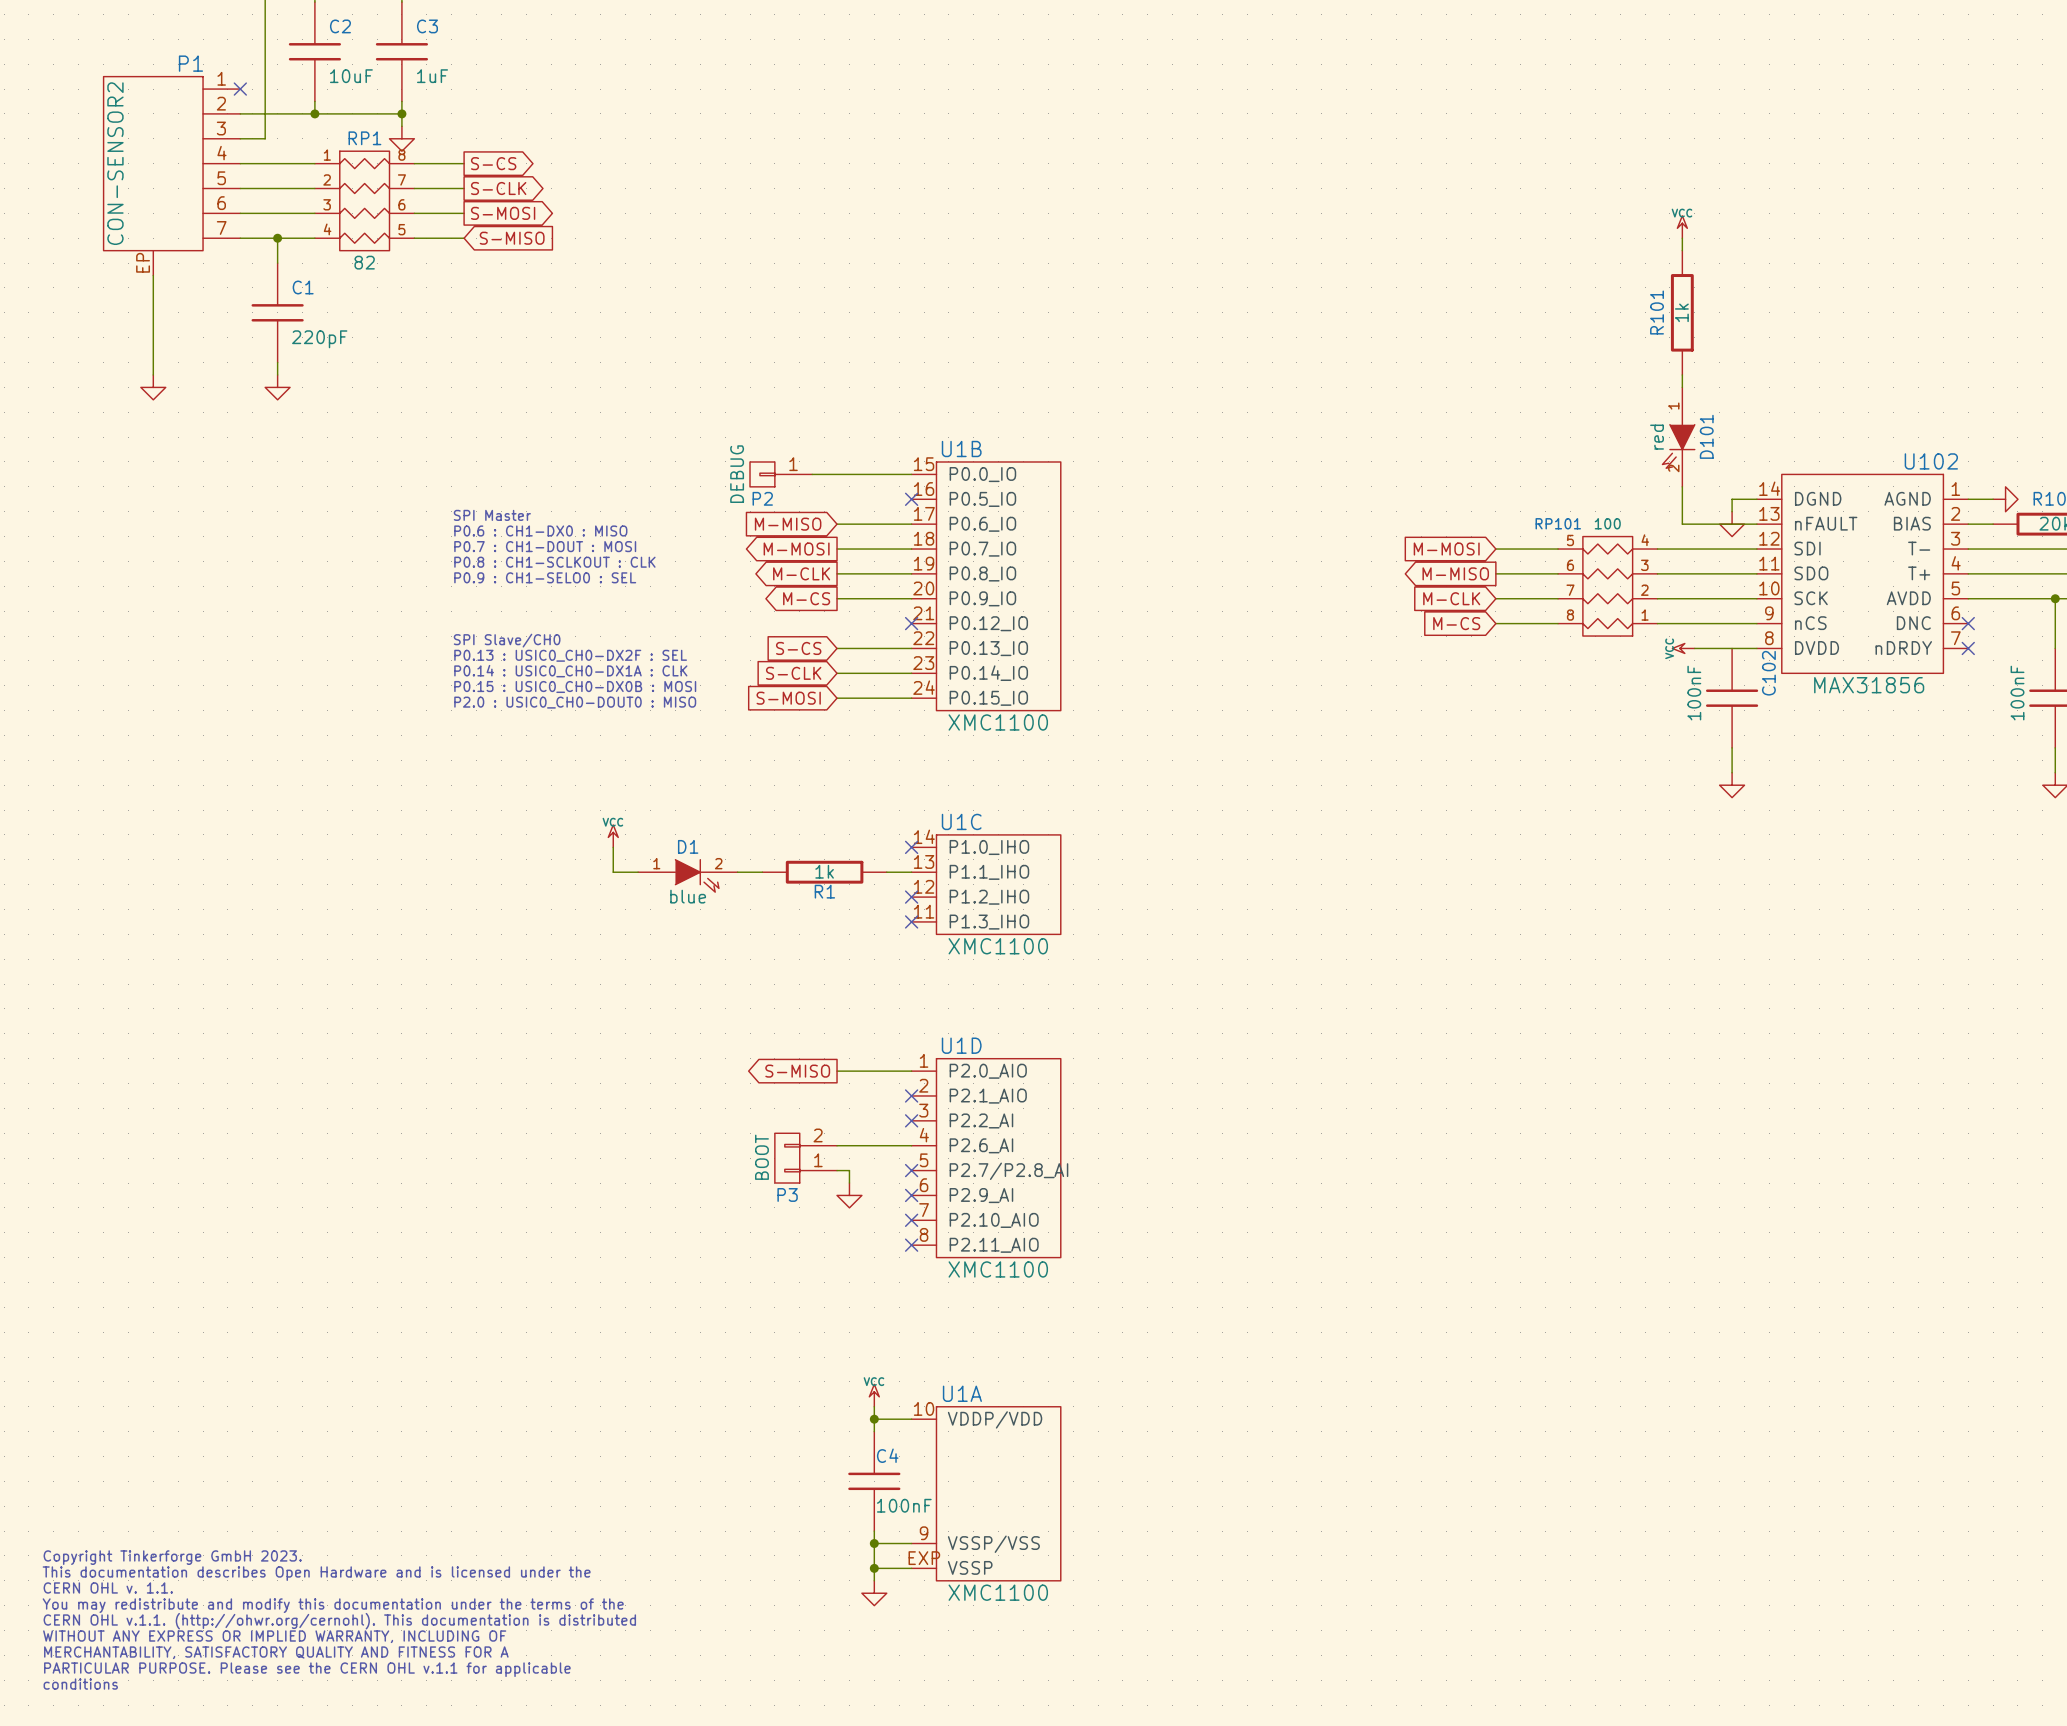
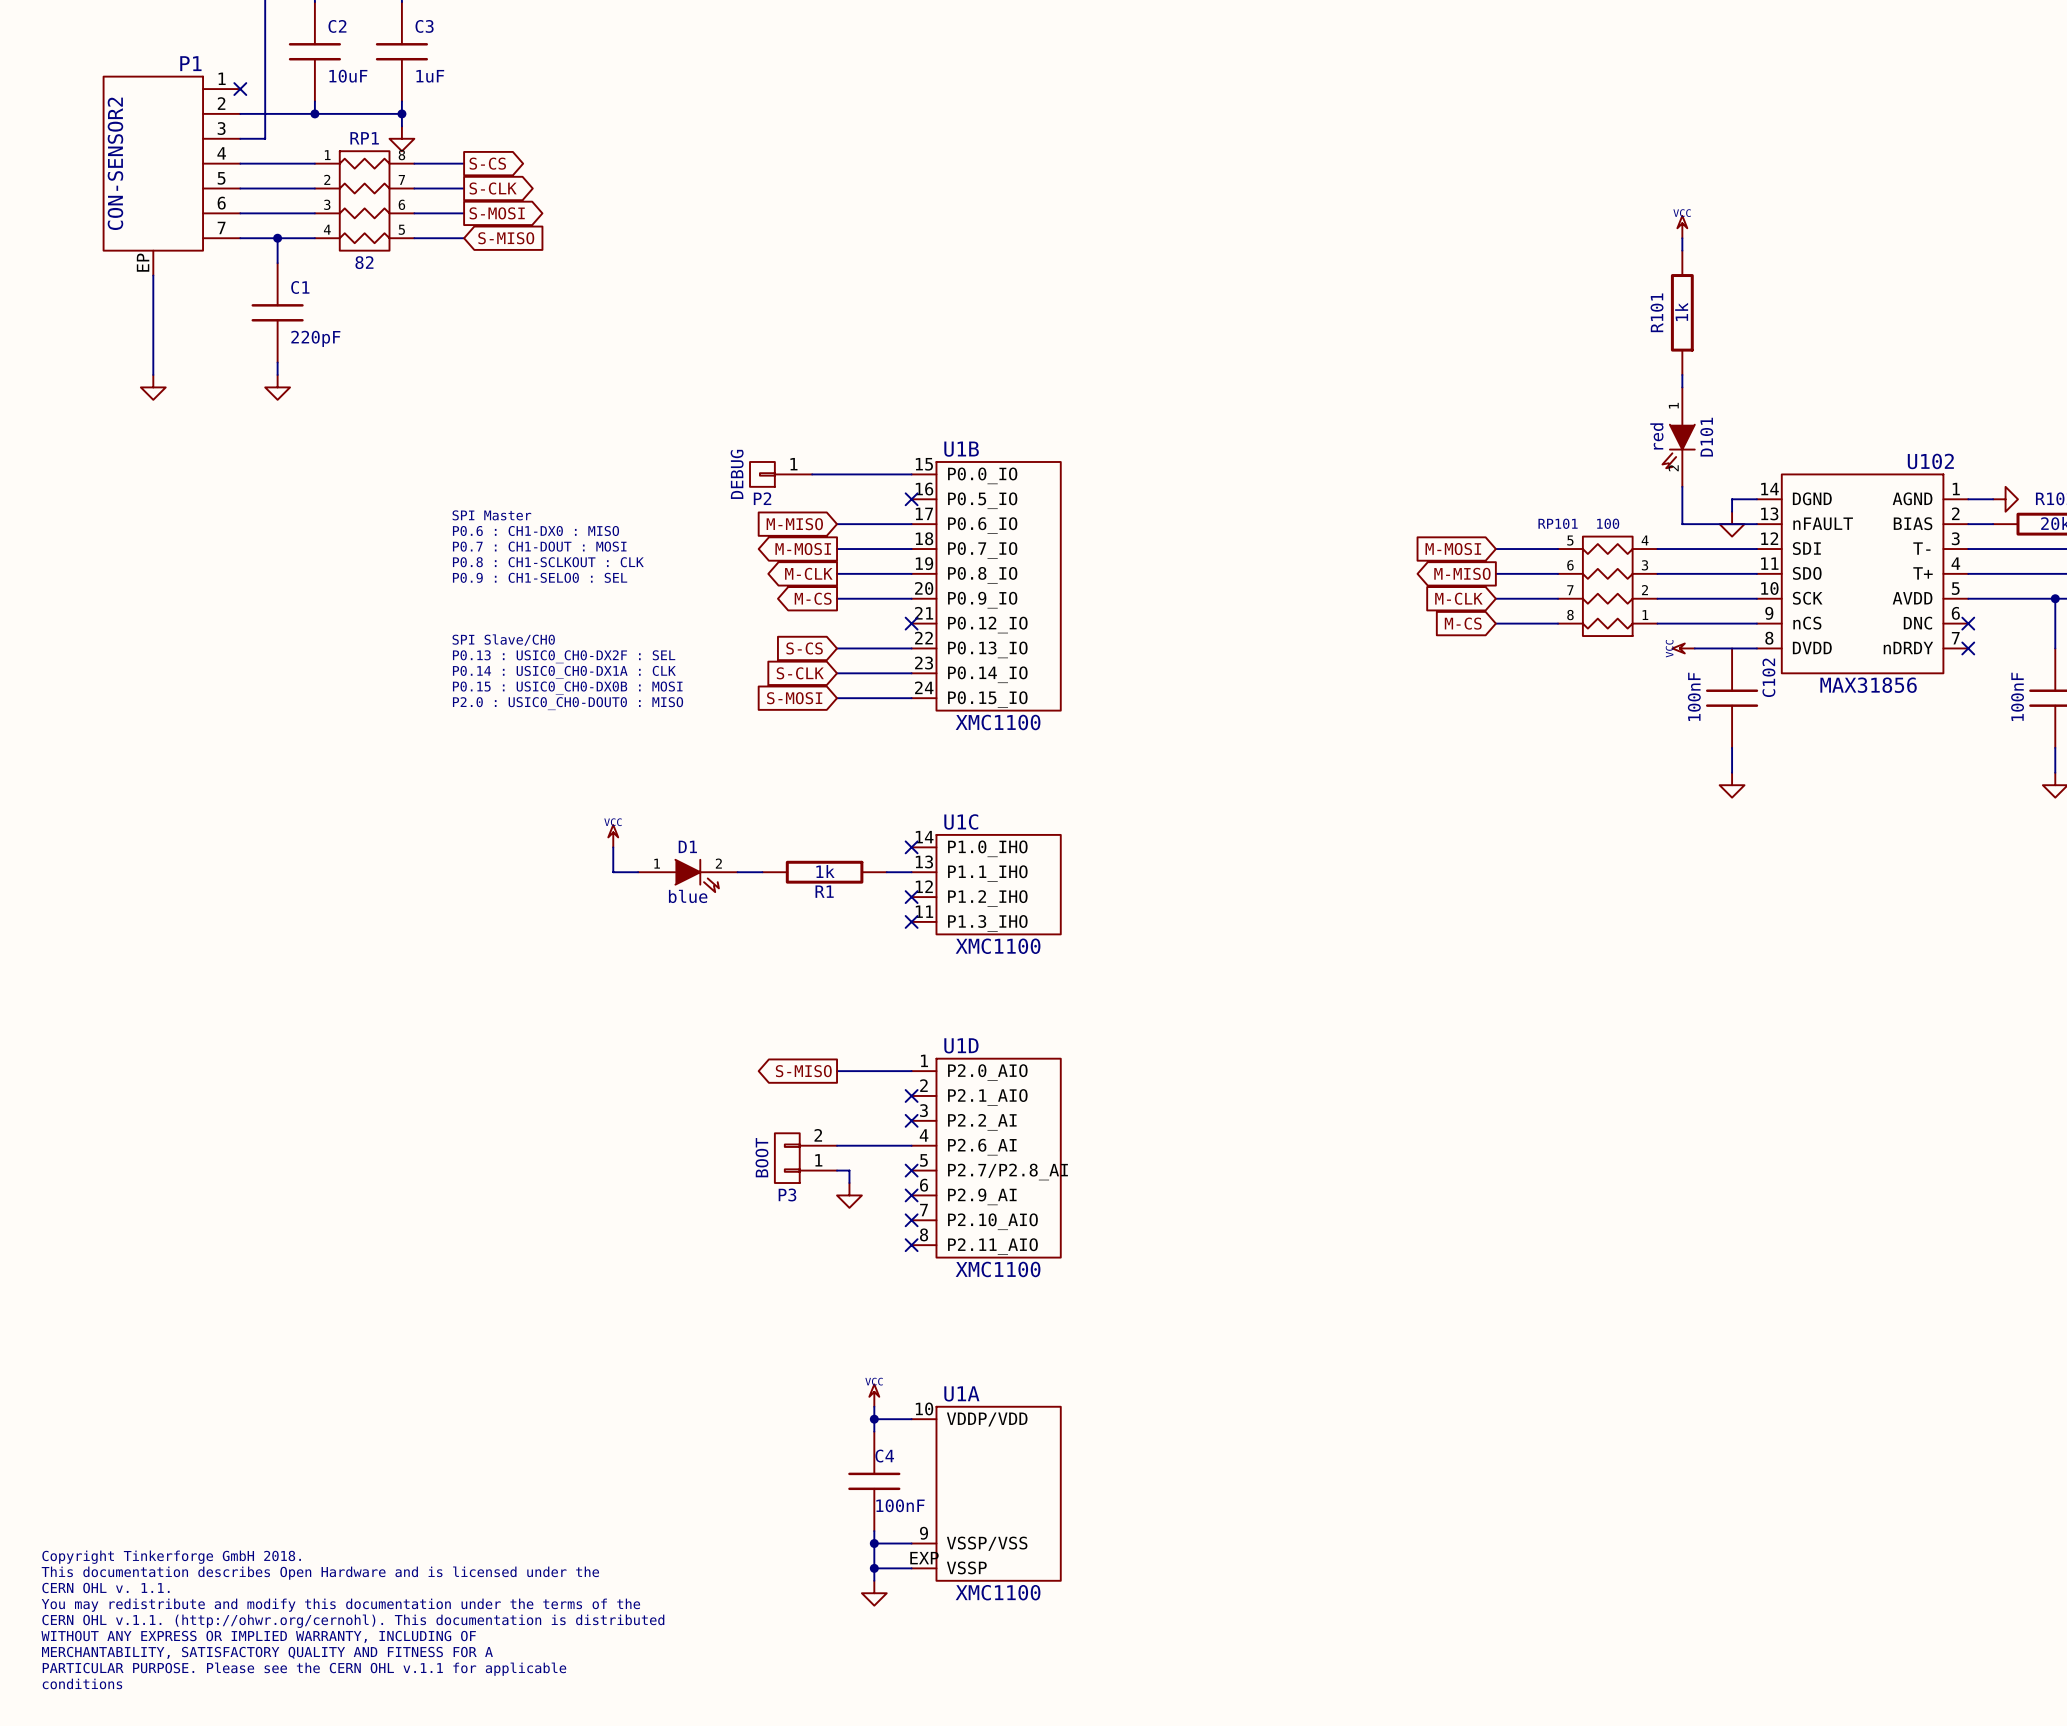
text: Copyright Tinkerforge GmbH 2023. (172, 1557) -> Copyright Tinkerforge GmbH 2018. (171, 1557)

